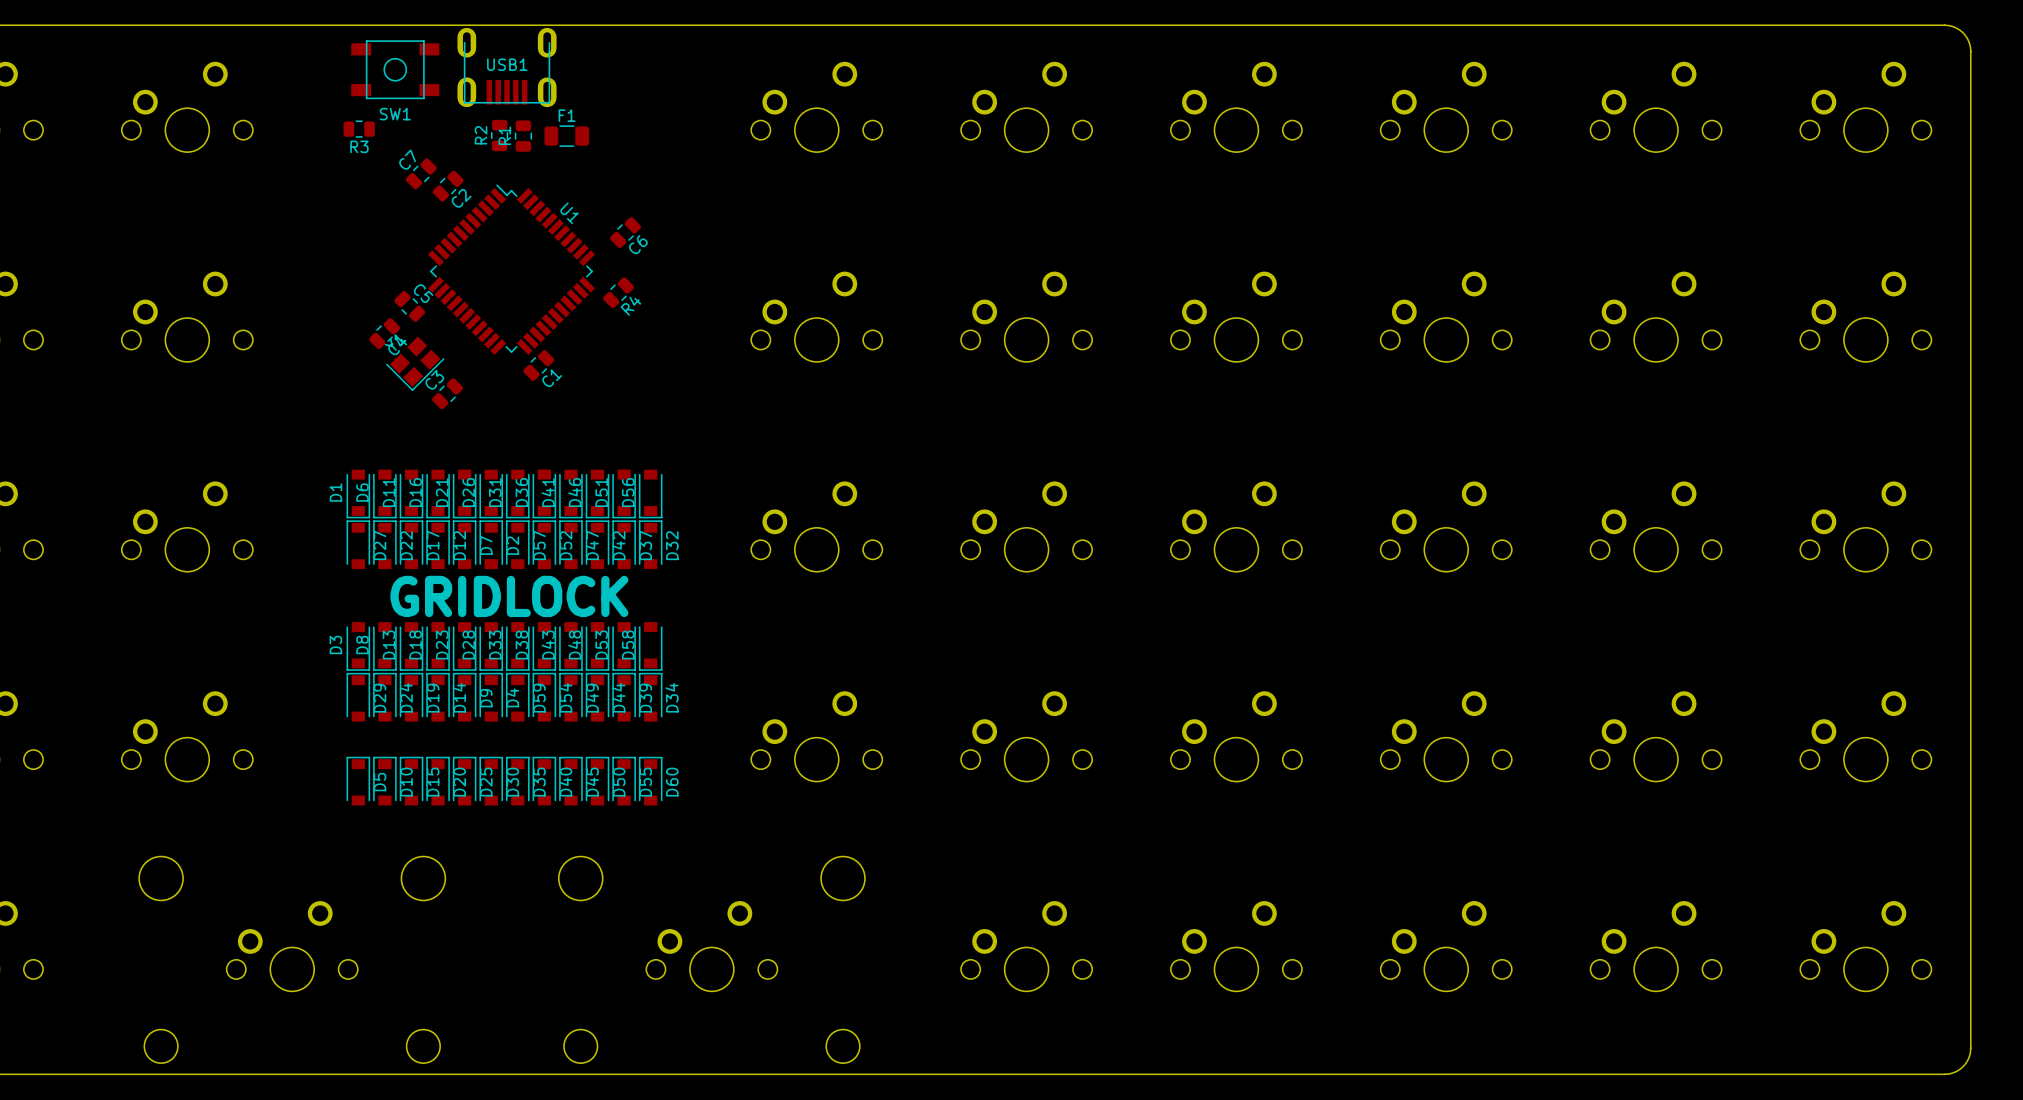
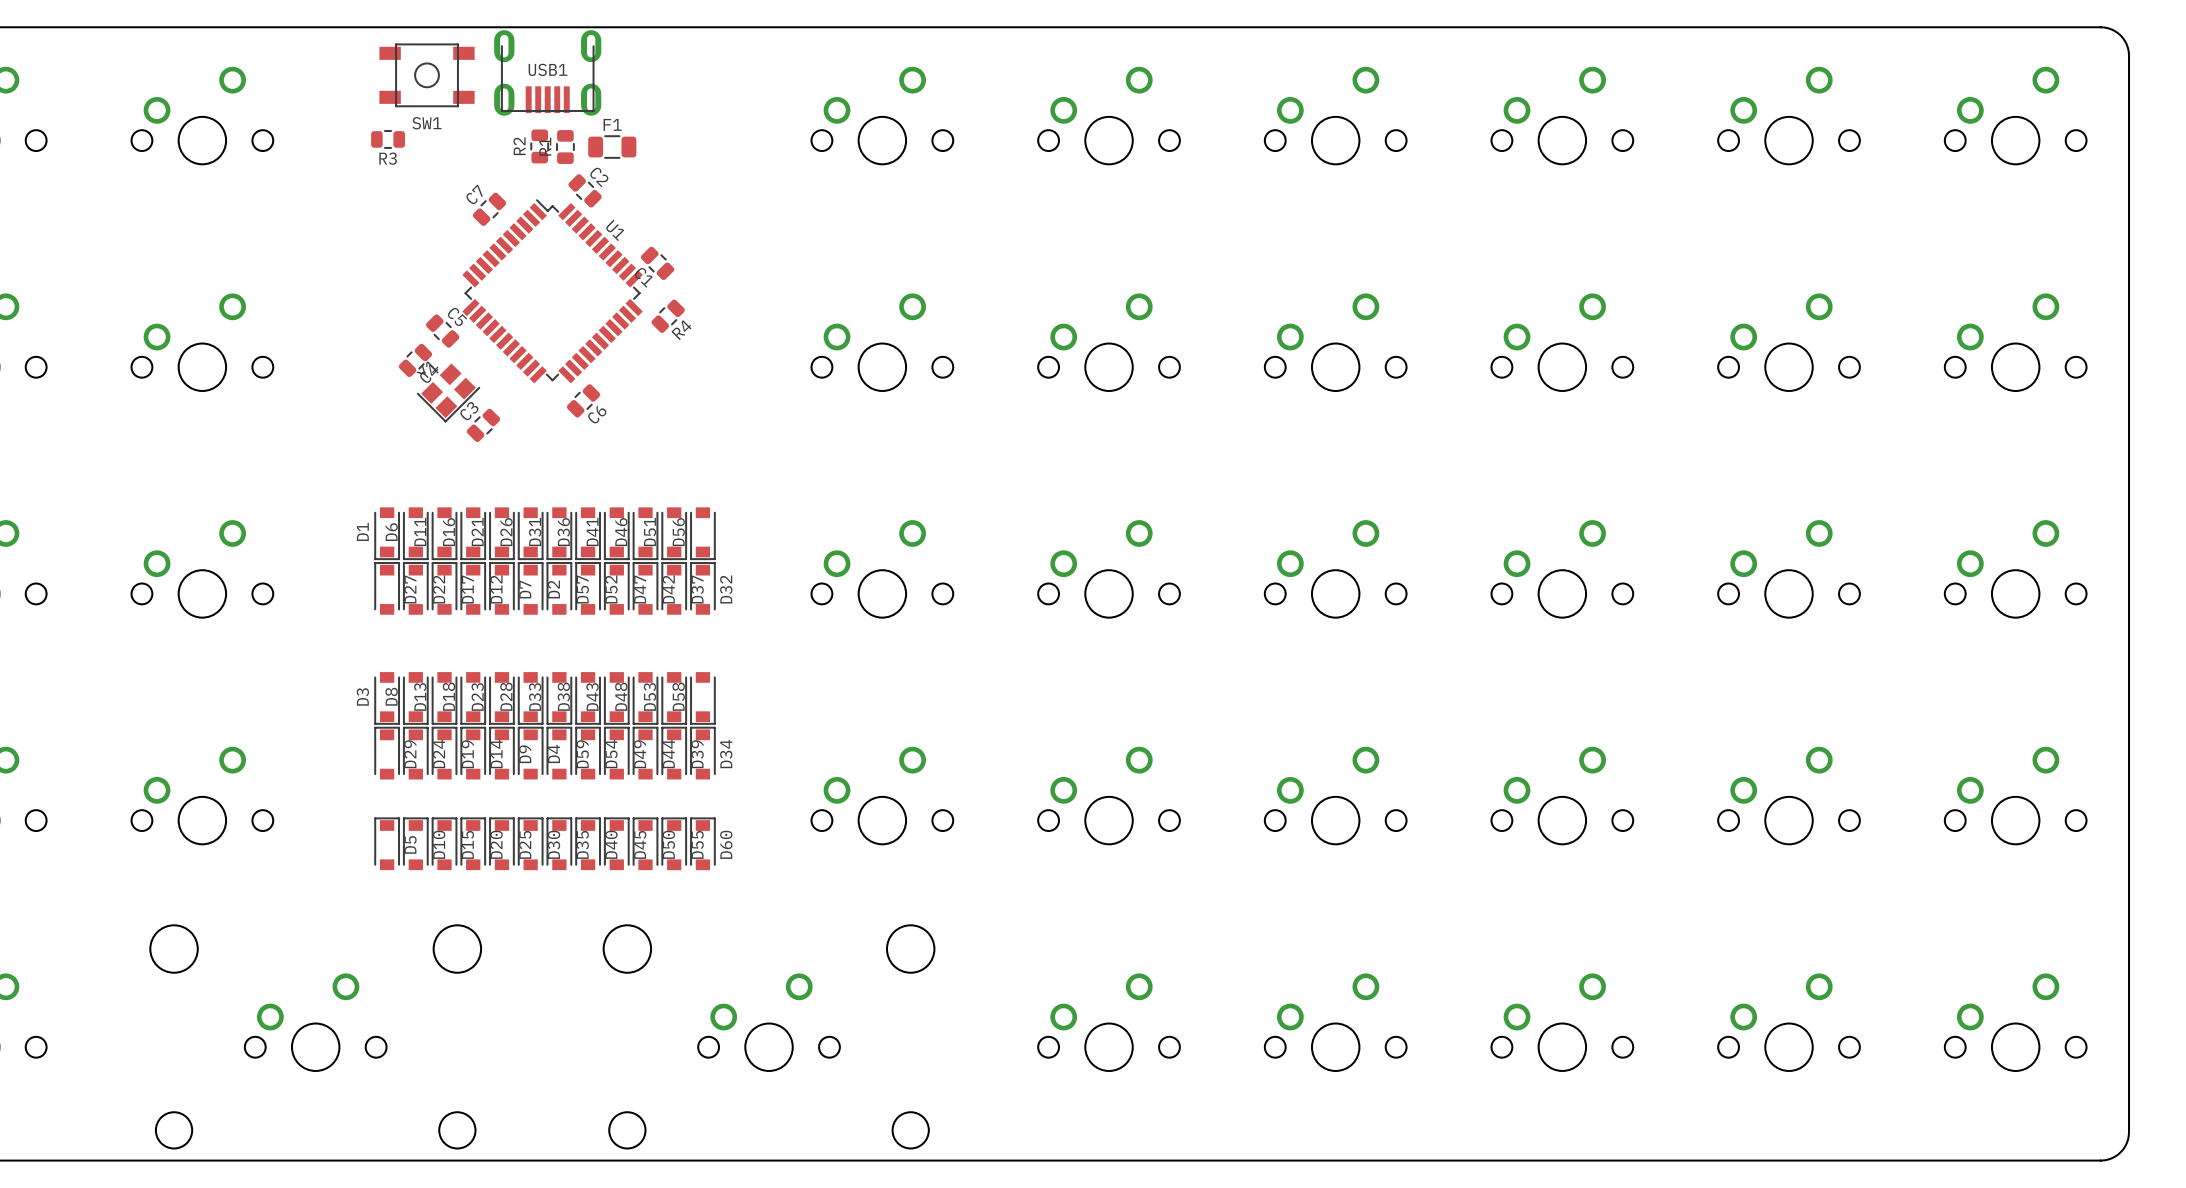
C7 position: (421, 173) -> (489, 209)
C2 rotation: 0° (448, 186) -> 90° clockwise (585, 190)
C2 position: (448, 186) -> (585, 190)
C2 name position: C2 (461, 198) -> C2 (599, 177)
C6 position: (625, 232) -> (583, 400)
C1 rotation: 0° (538, 365) -> 90° clockwise (657, 263)
C1 position: (538, 365) -> (657, 263)
text: GRIDLOCK (509, 596) -> none

